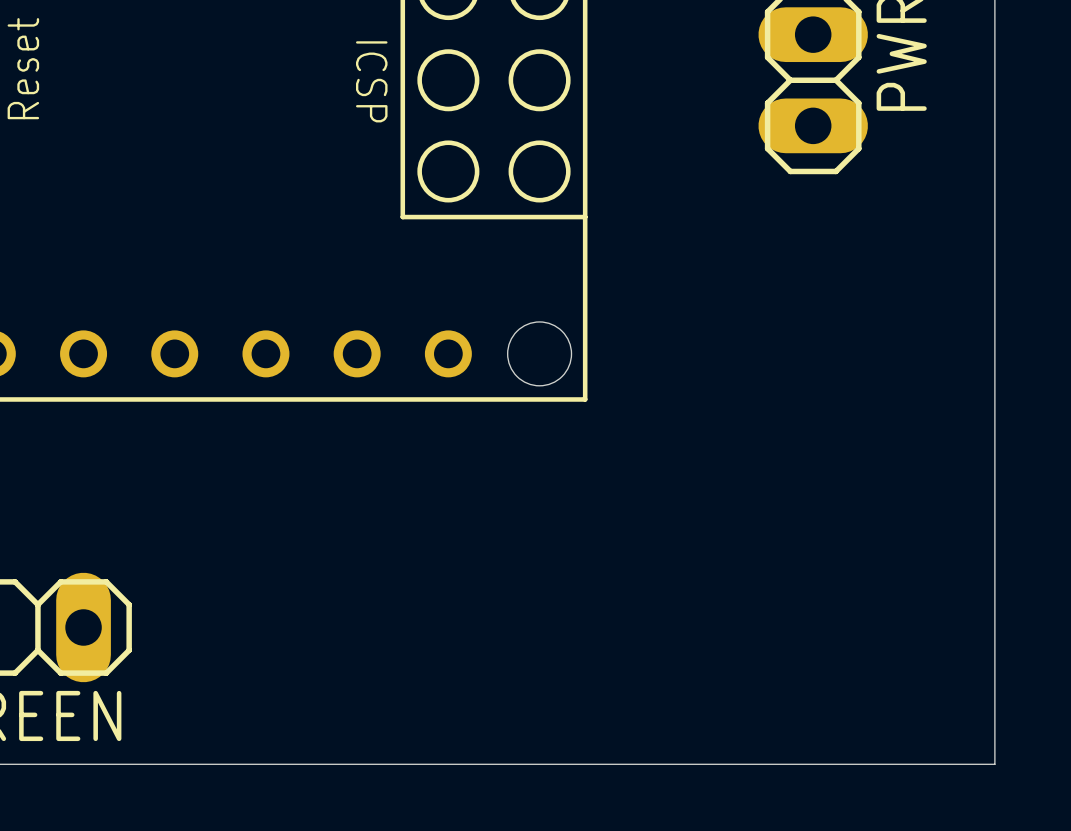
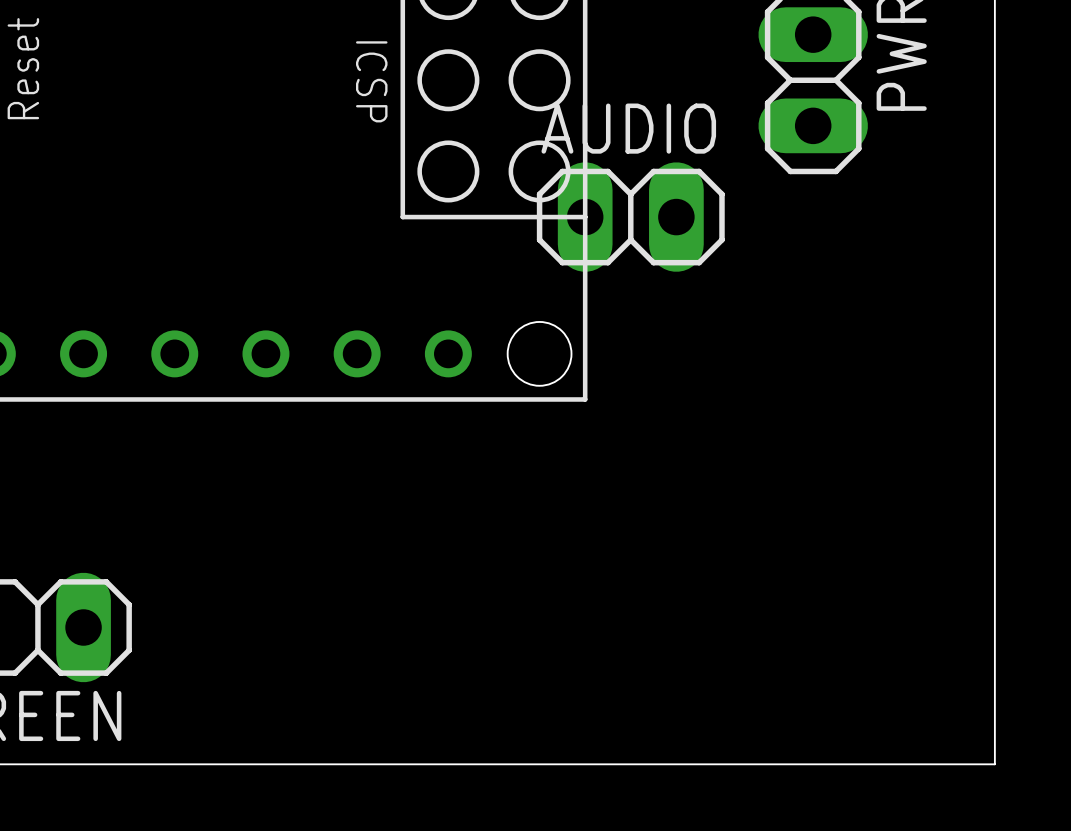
AUDIO: none -> (630, 217)

